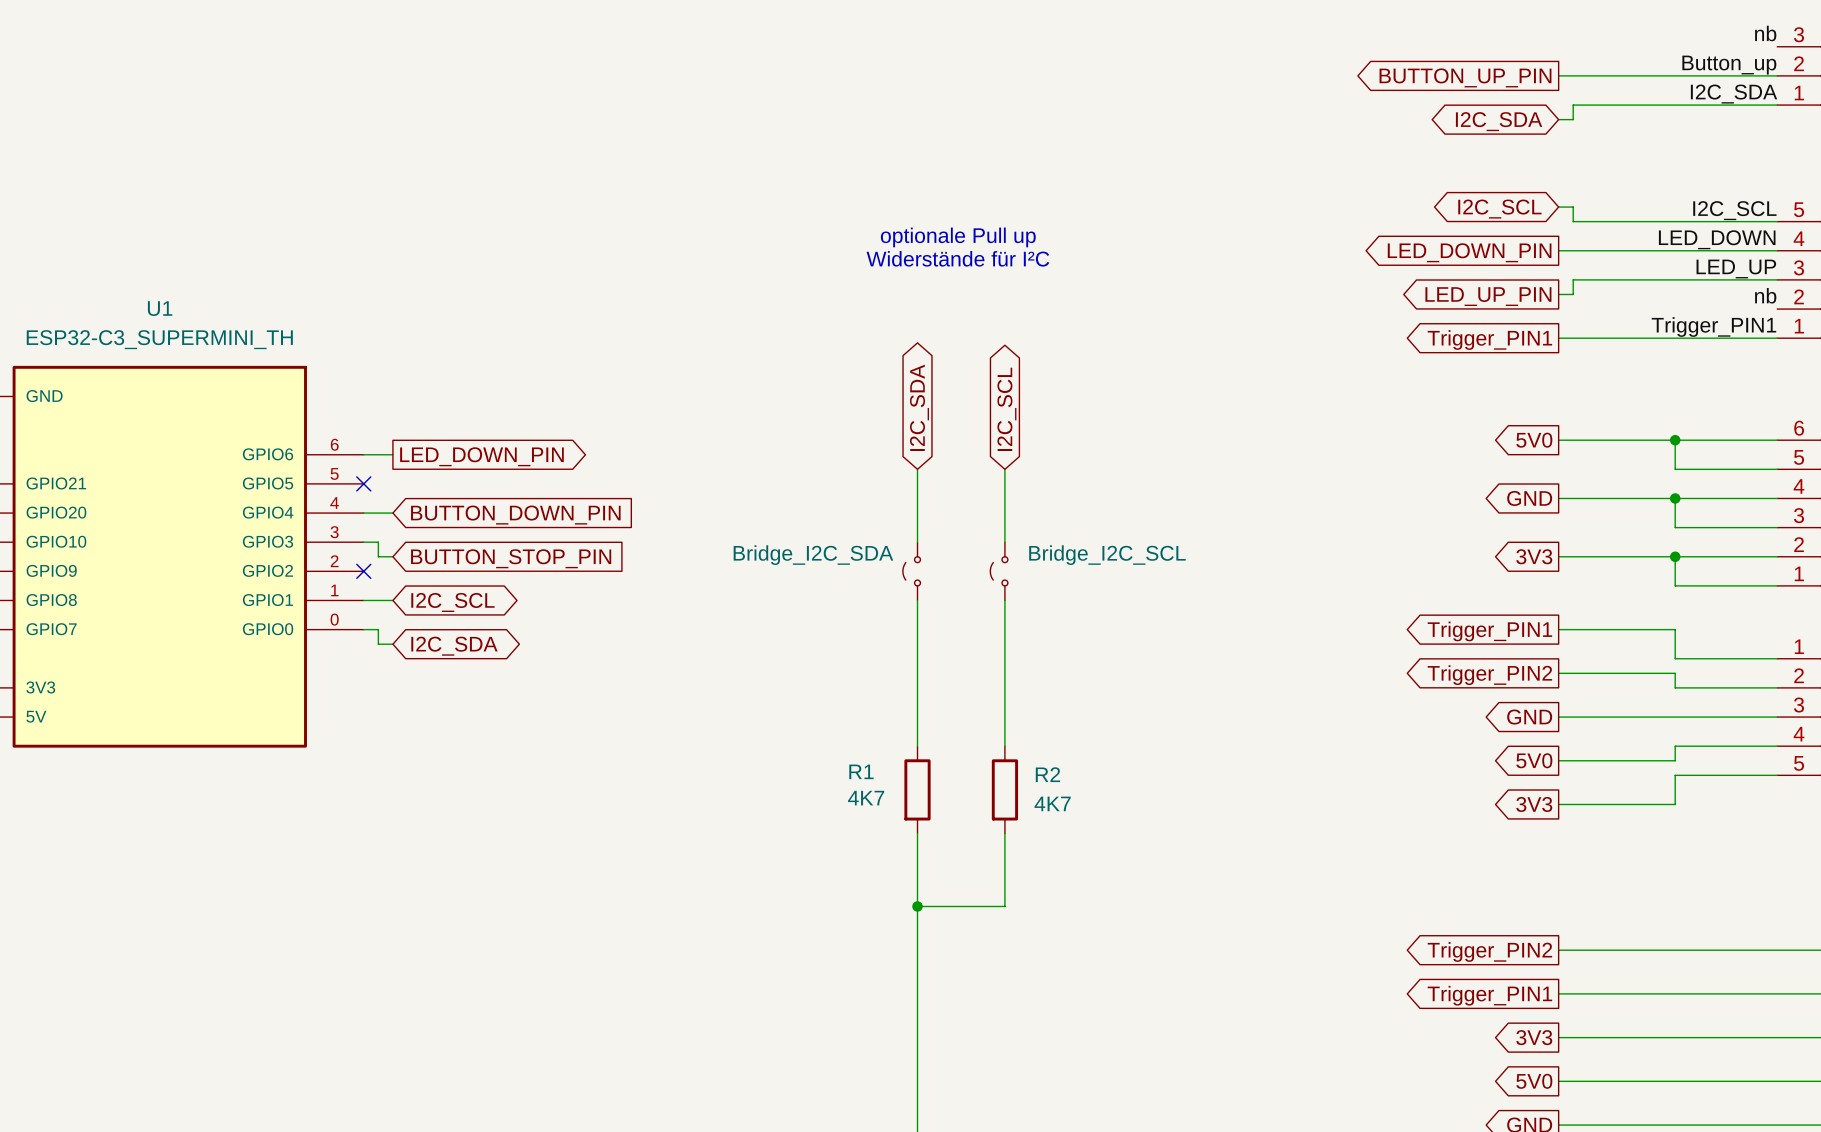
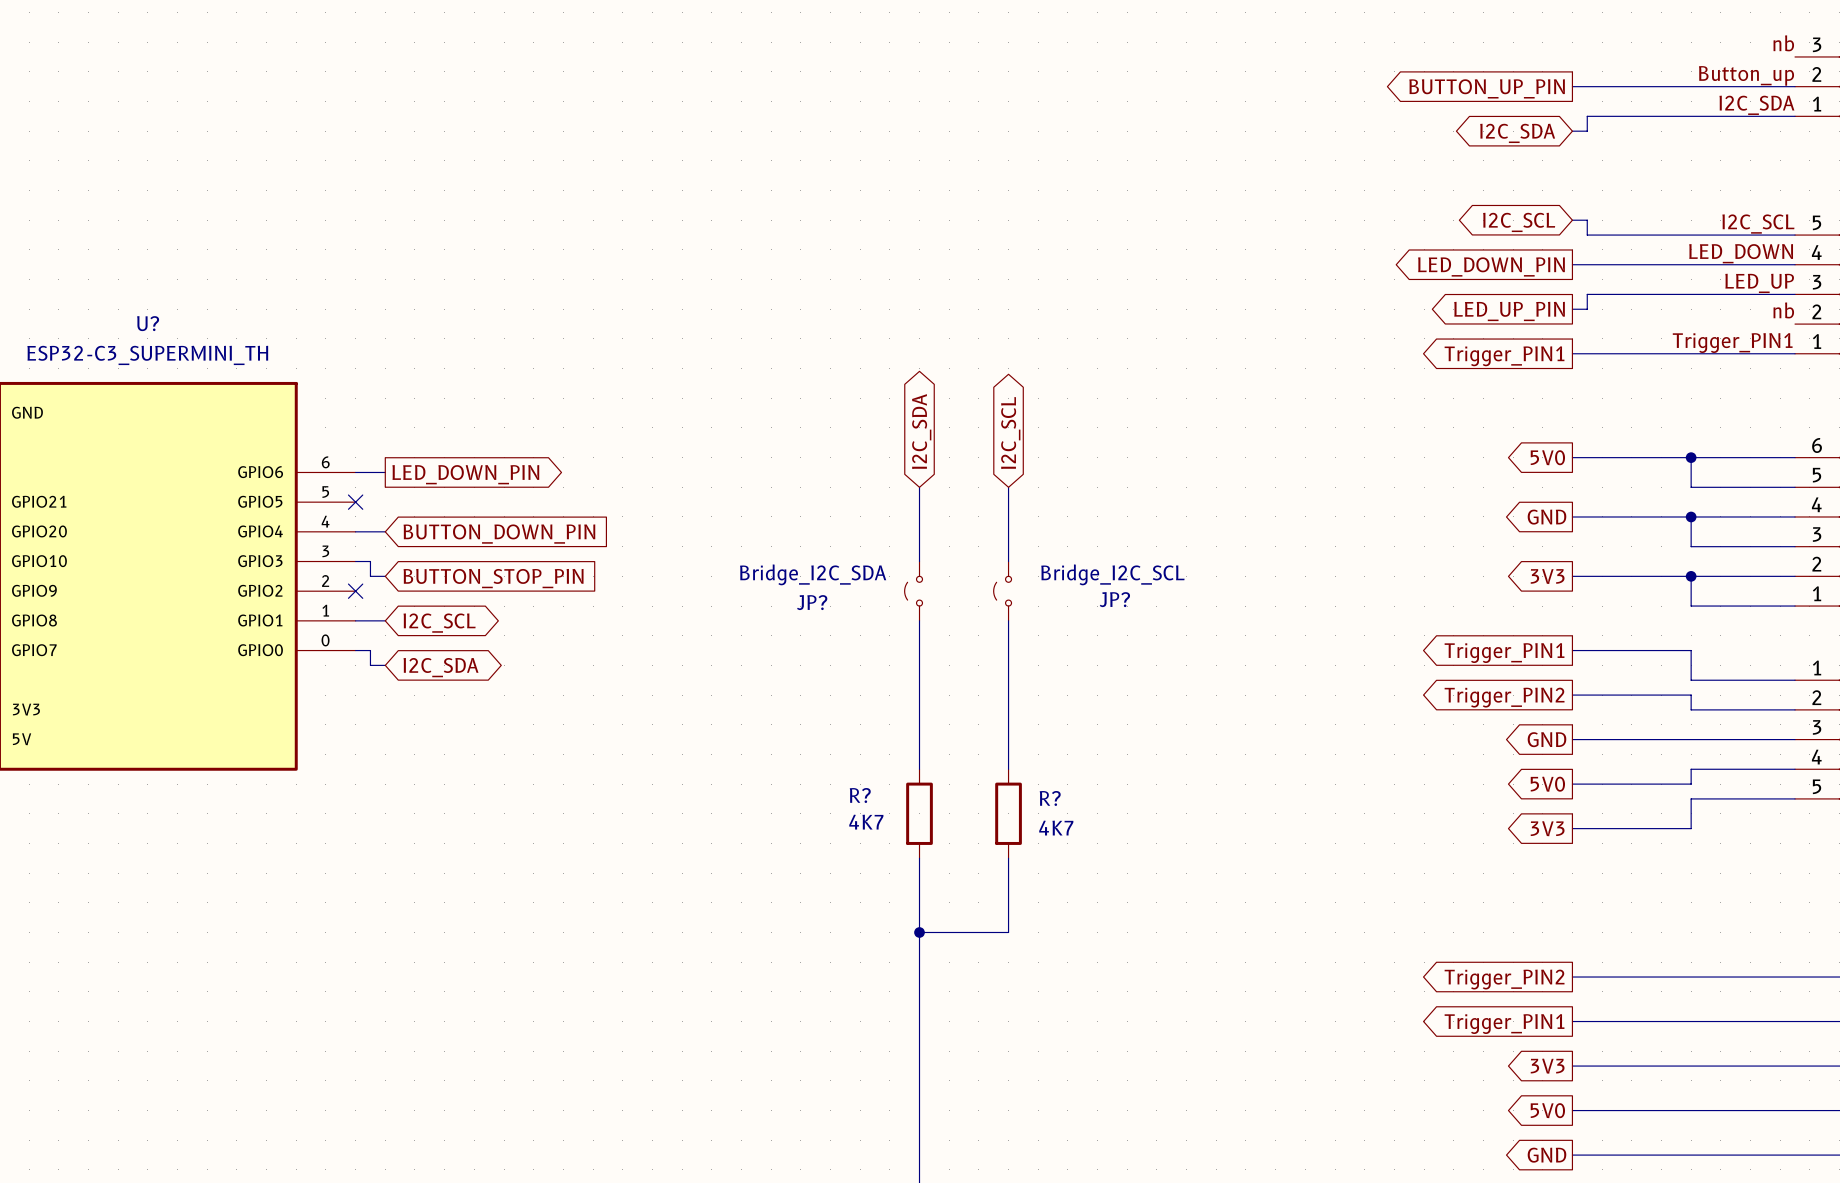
text: optionale Pull up (958, 237) -> none
text: Widerstände für I²C (957, 258) -> none
U1 name: U1 (160, 308) -> U? (148, 323)
JP? name: none -> JP? (1114, 599)
JP? name: none -> JP? (812, 602)
R1 name: R1 (861, 771) -> R? (860, 795)
R2 name: R2 (1047, 774) -> R? (1050, 798)

